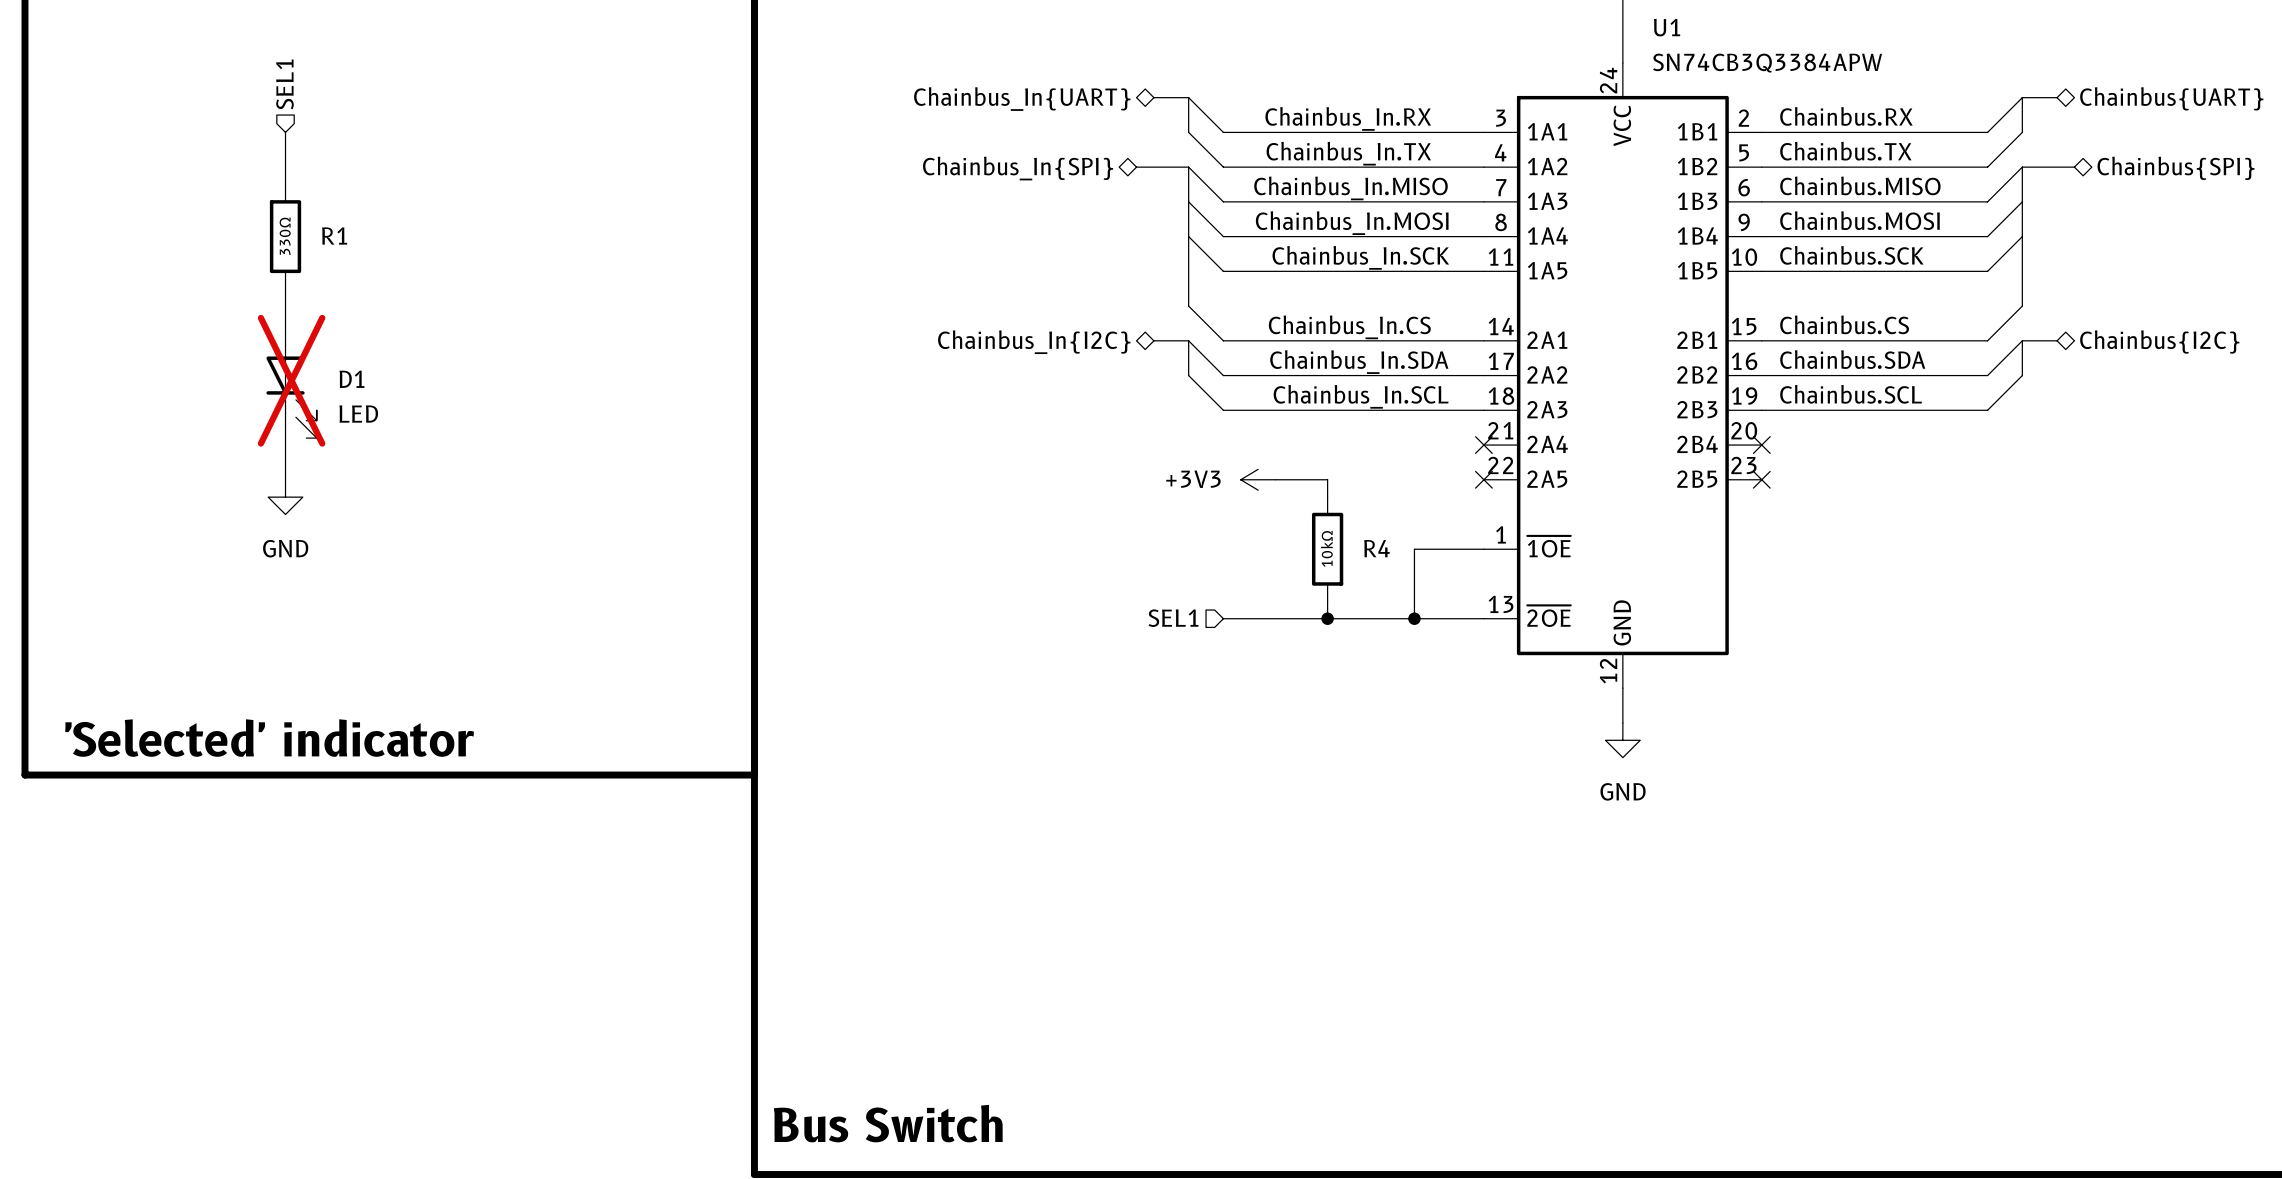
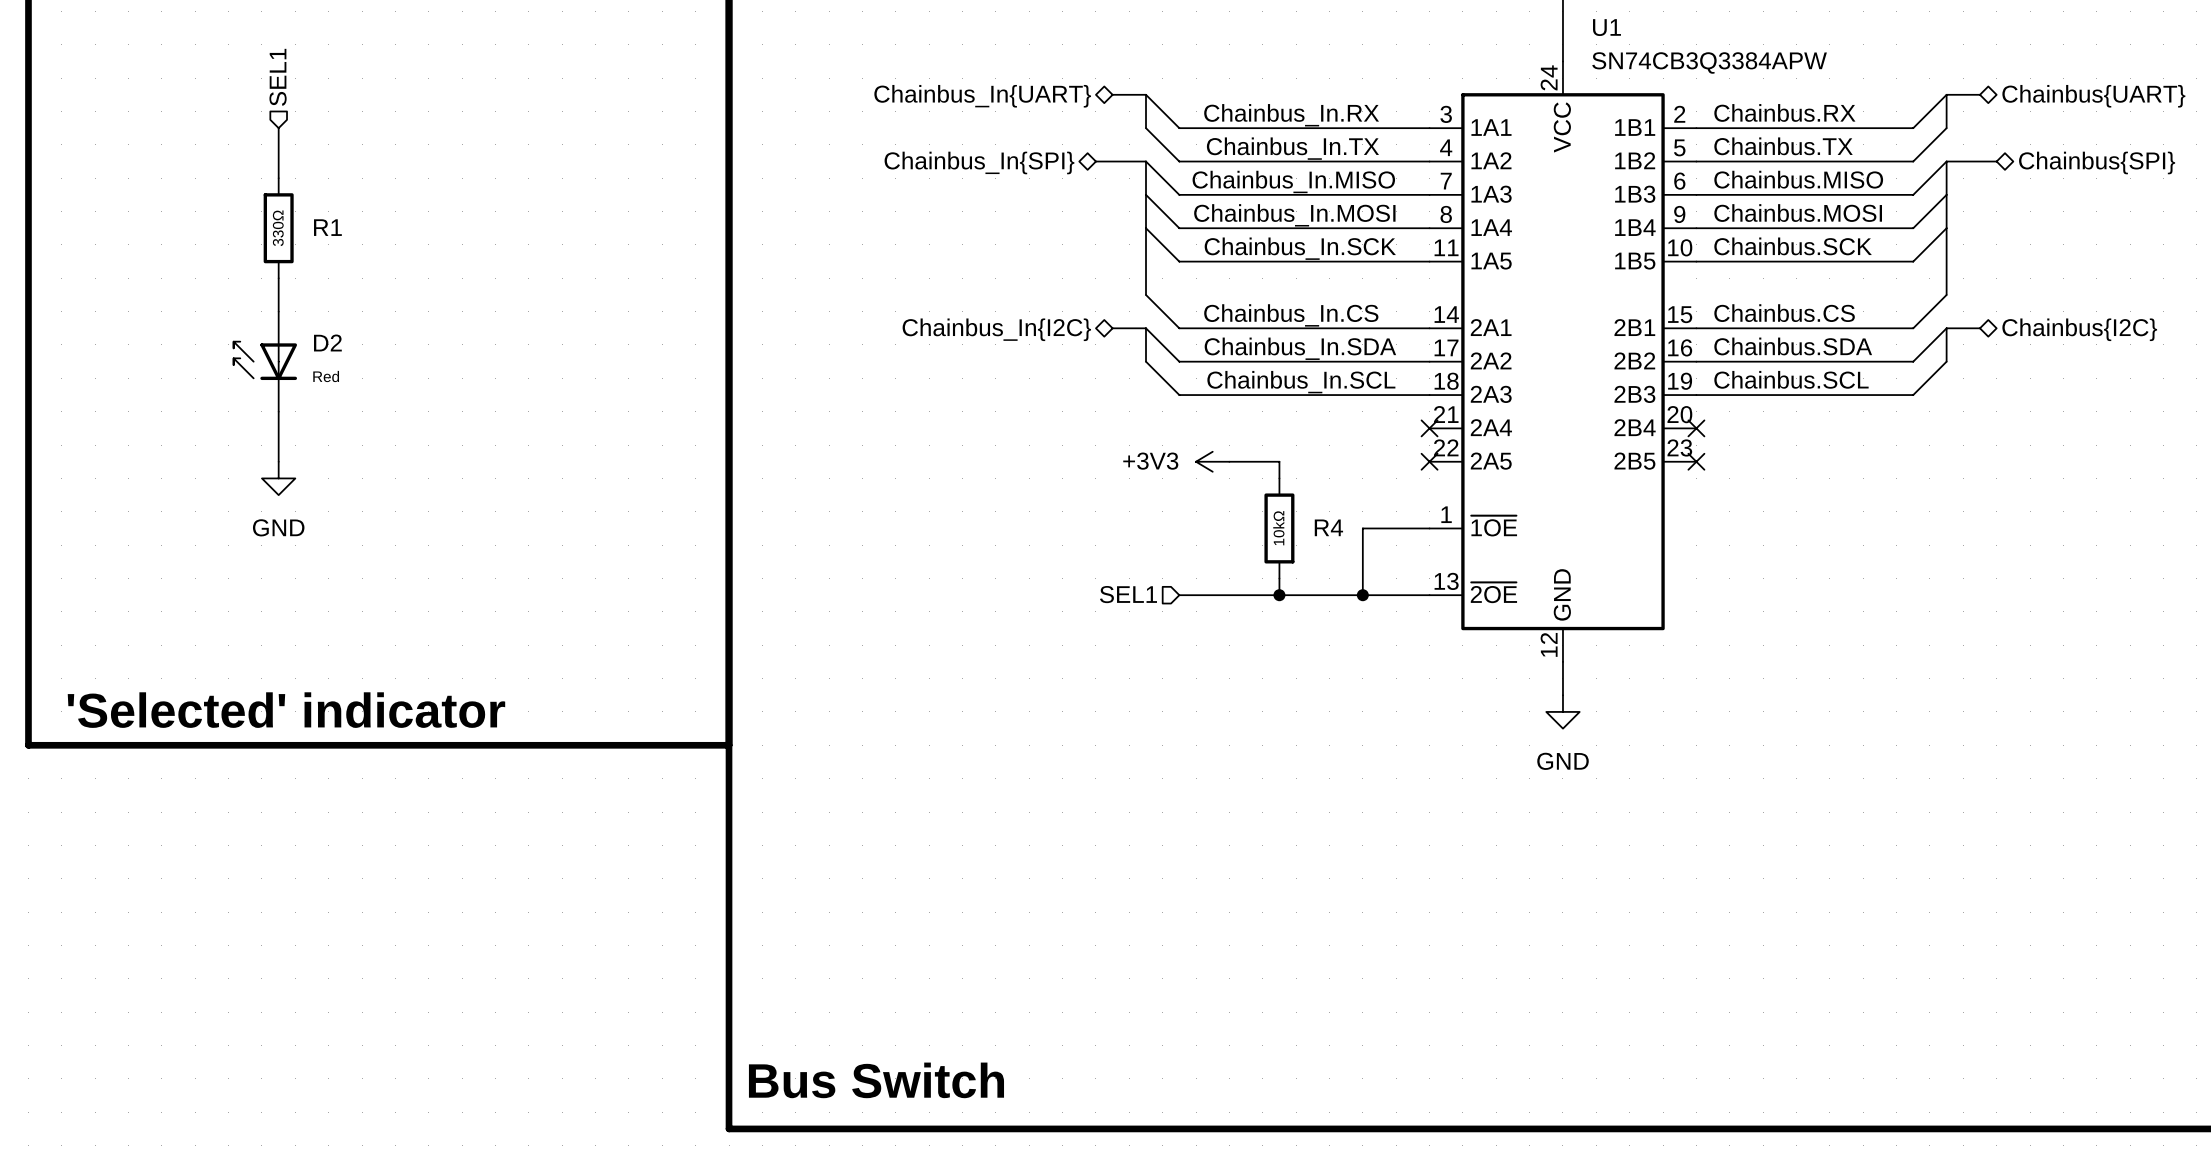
D2: none -> Red (264, 361)
D1: LED (291, 380) -> none

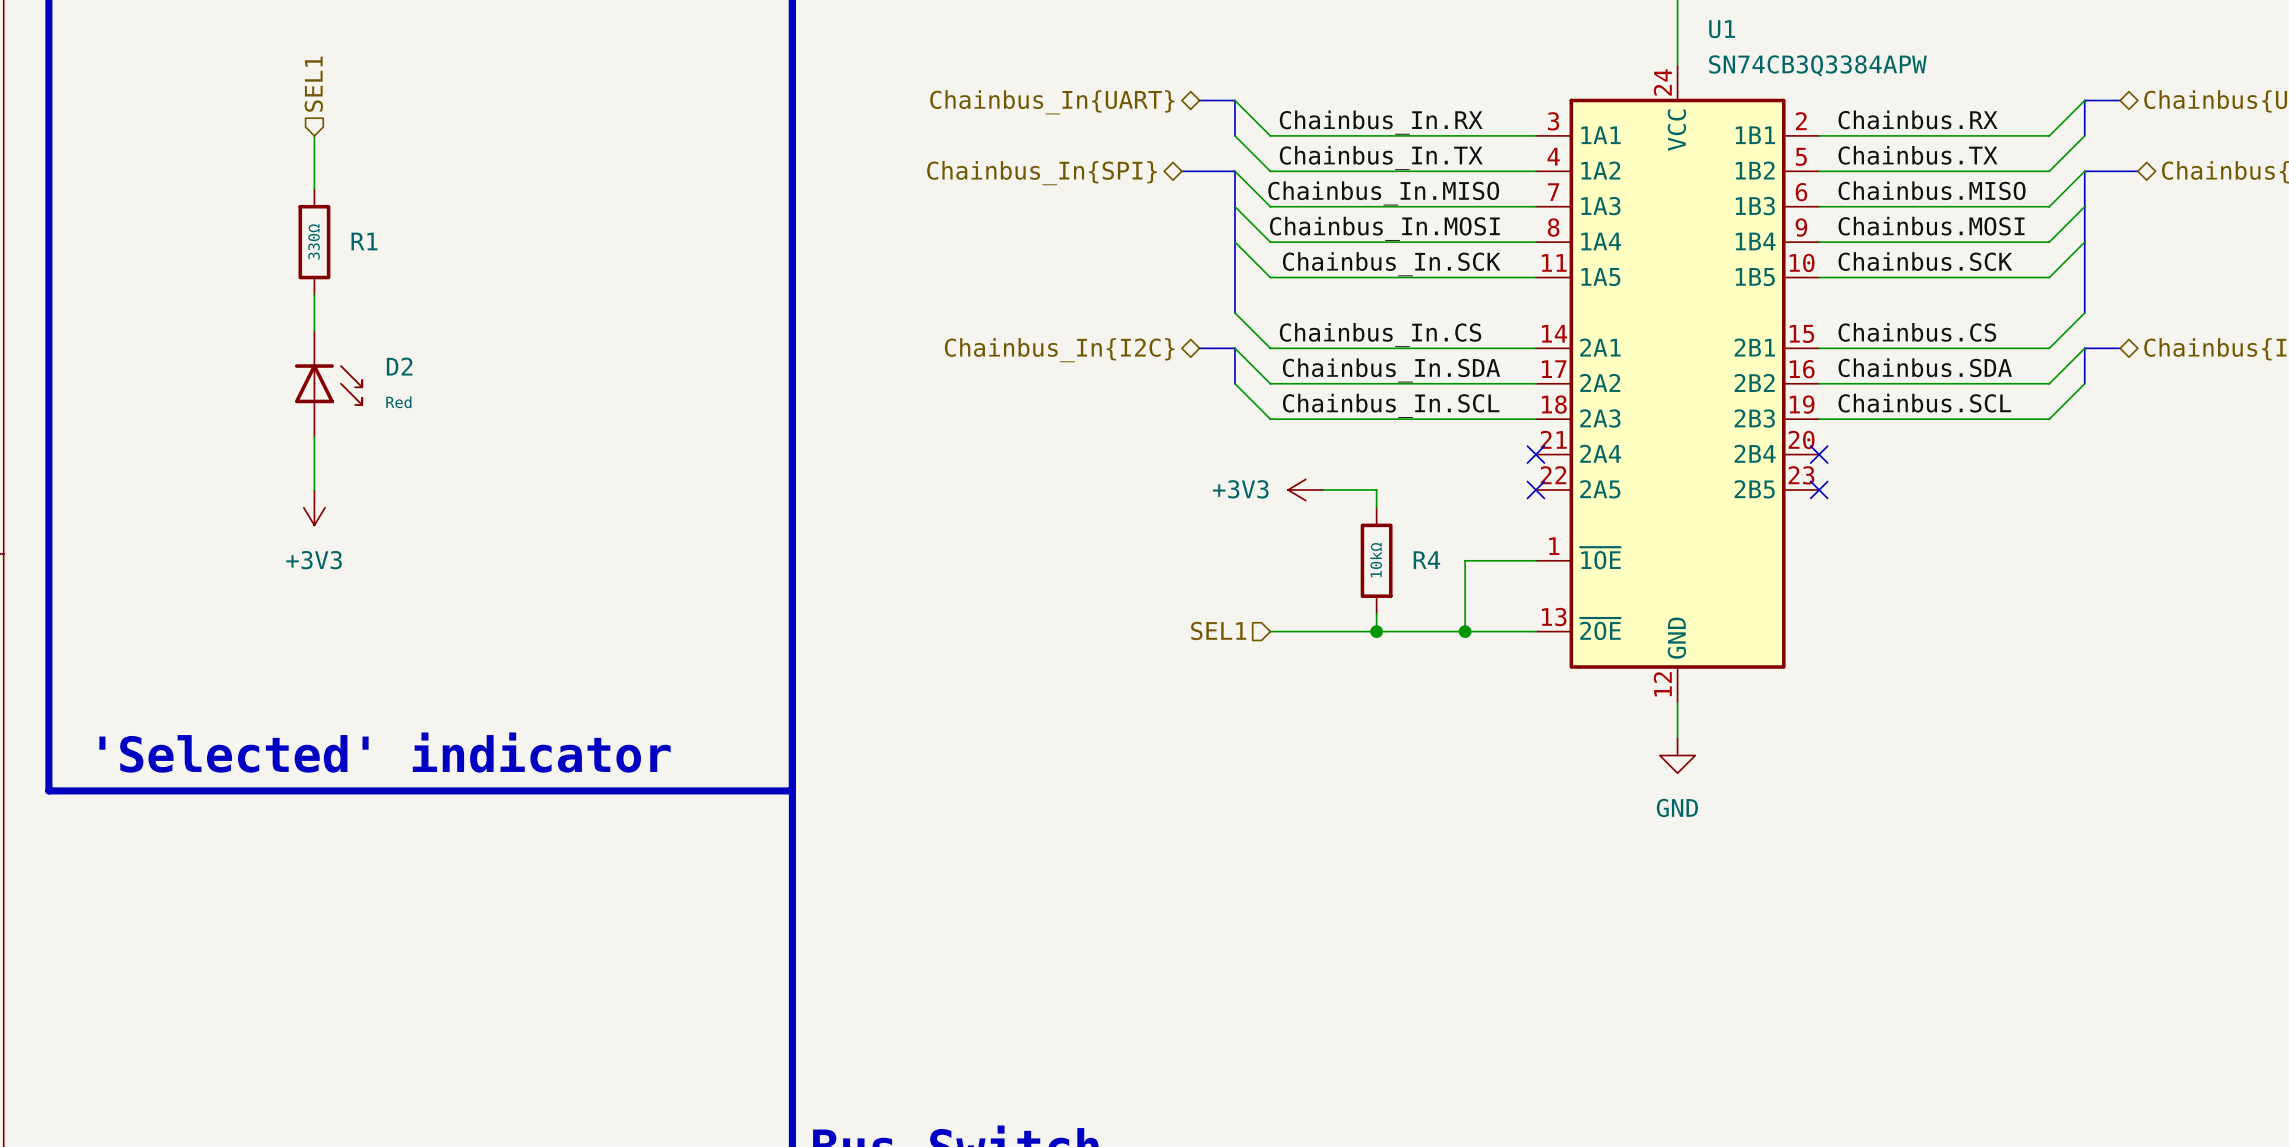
D2 rotation: 0° (264, 360) -> 180° (329, 385)
power symbol: GND (278, 478) -> +3V3 (314, 507)

